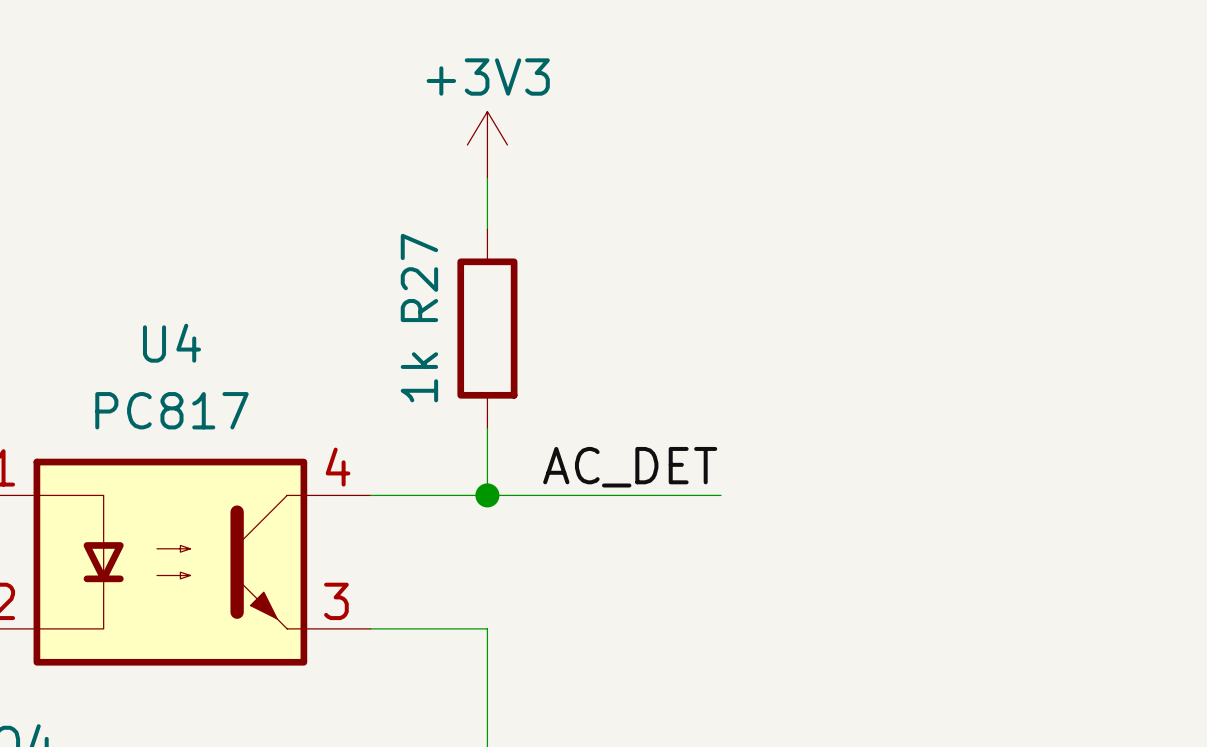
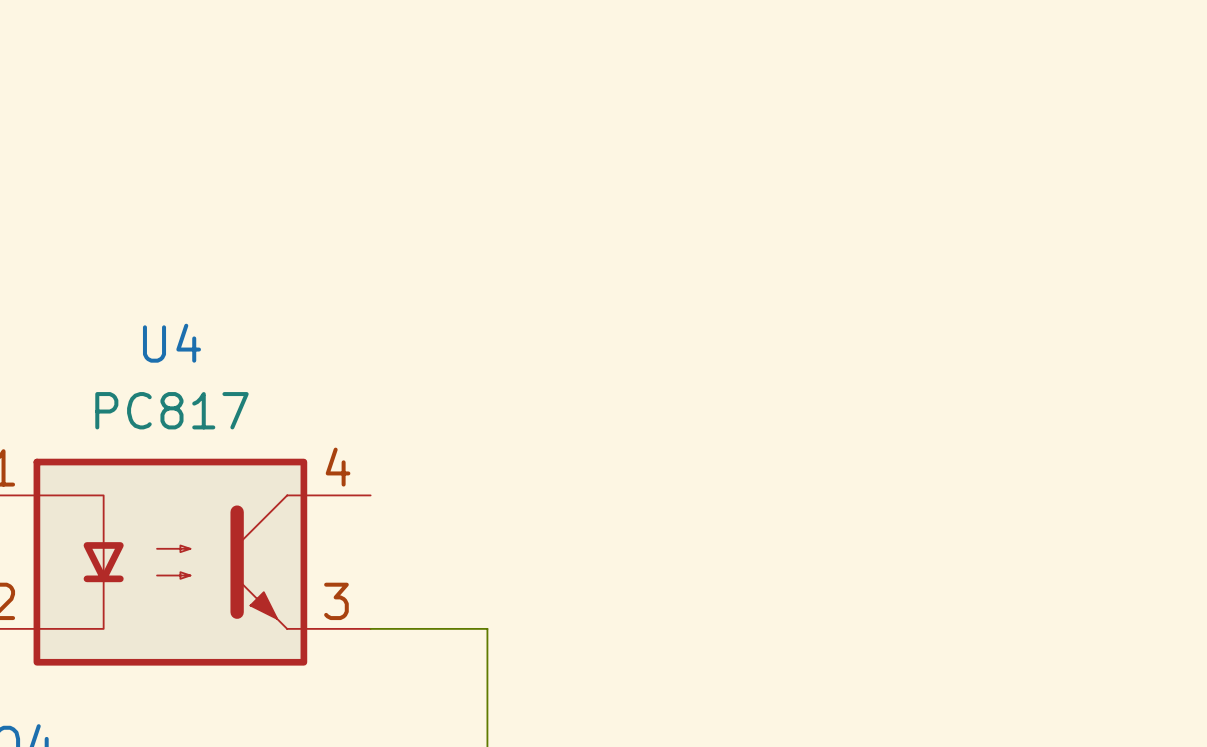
power symbol: +3V3 (487, 145) -> none
wire: (487, 178) (487, 228) -> none
R27: 1k (487, 328) -> none
wire: (487, 428) (487, 495) -> none
label: AC_DET (630, 467) -> none
wire: (370, 495) (721, 495) -> none
junction: (487, 495) -> none

